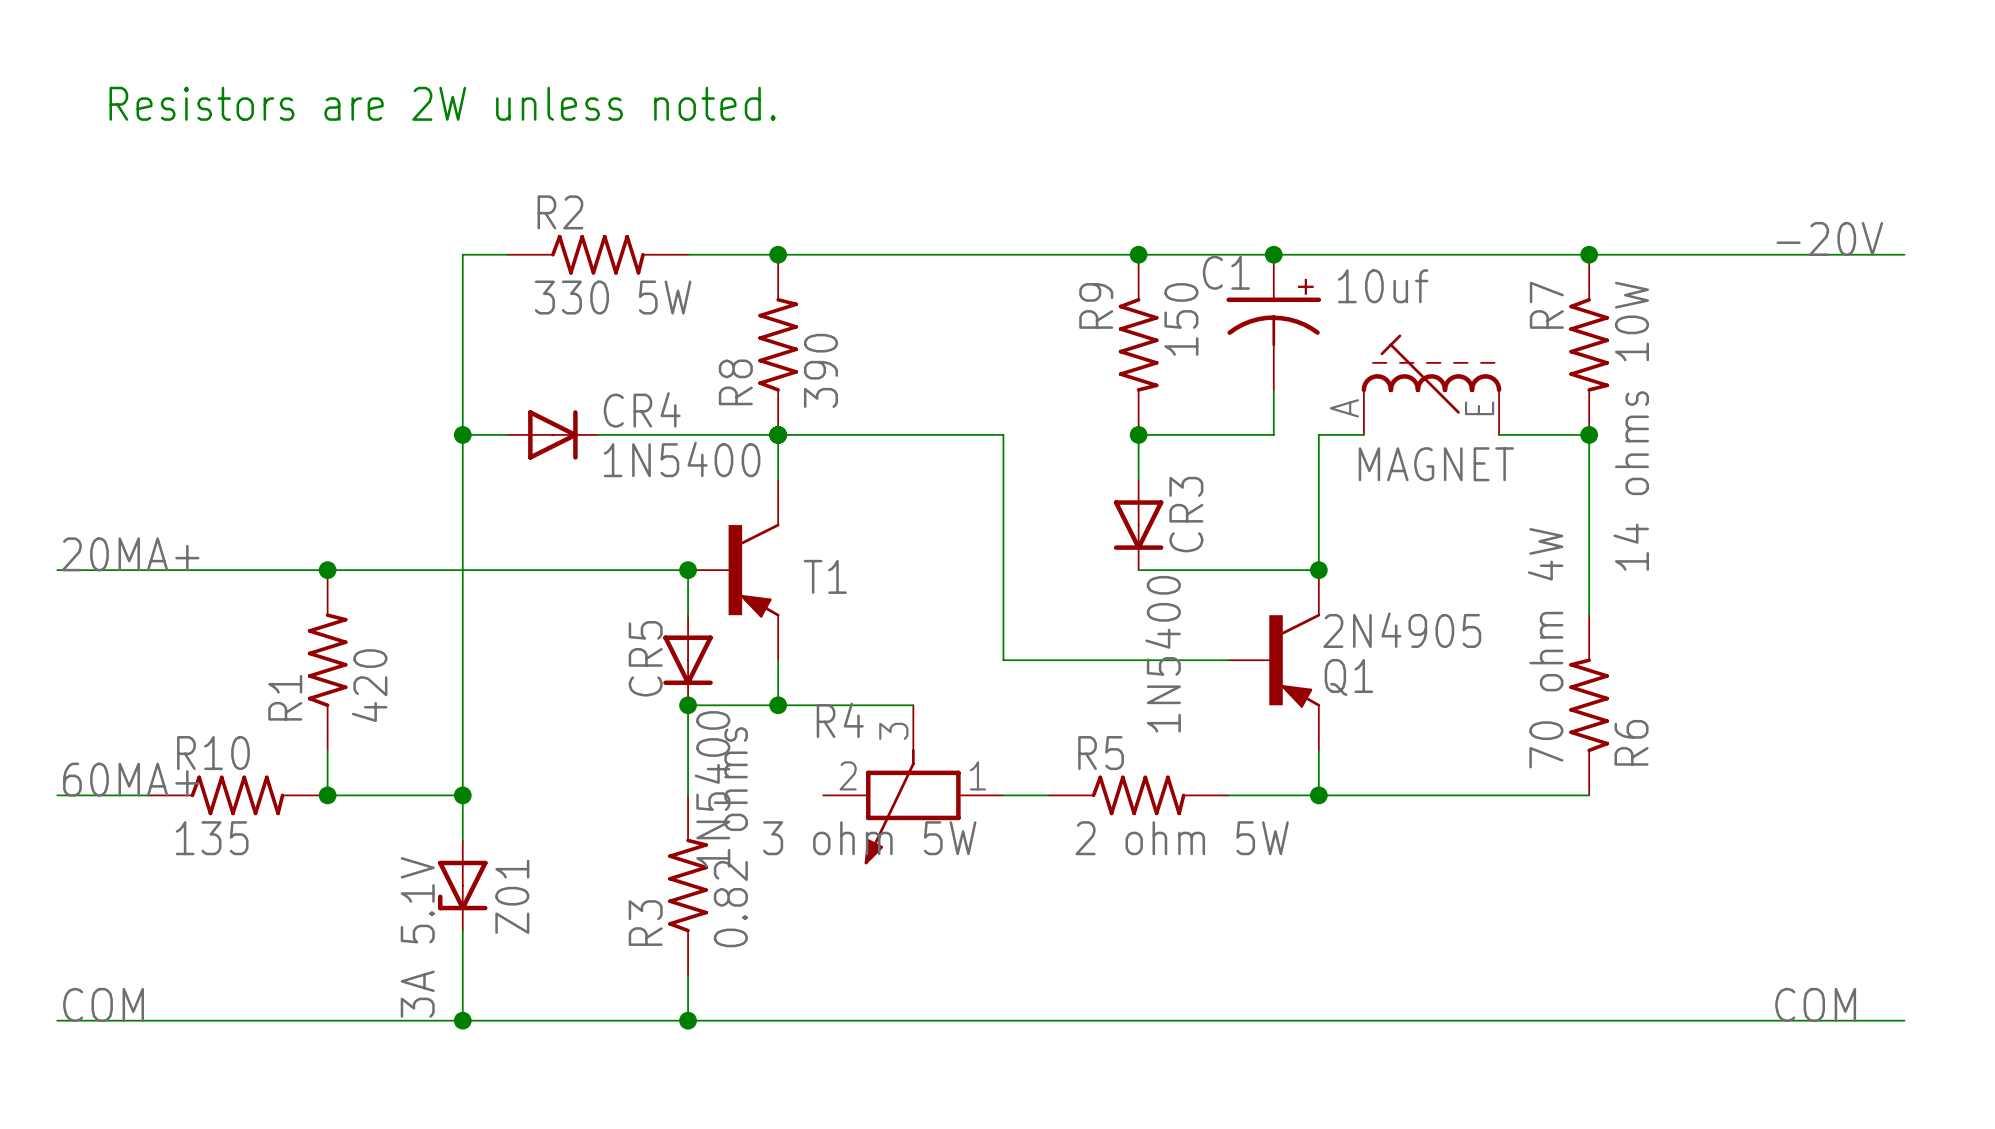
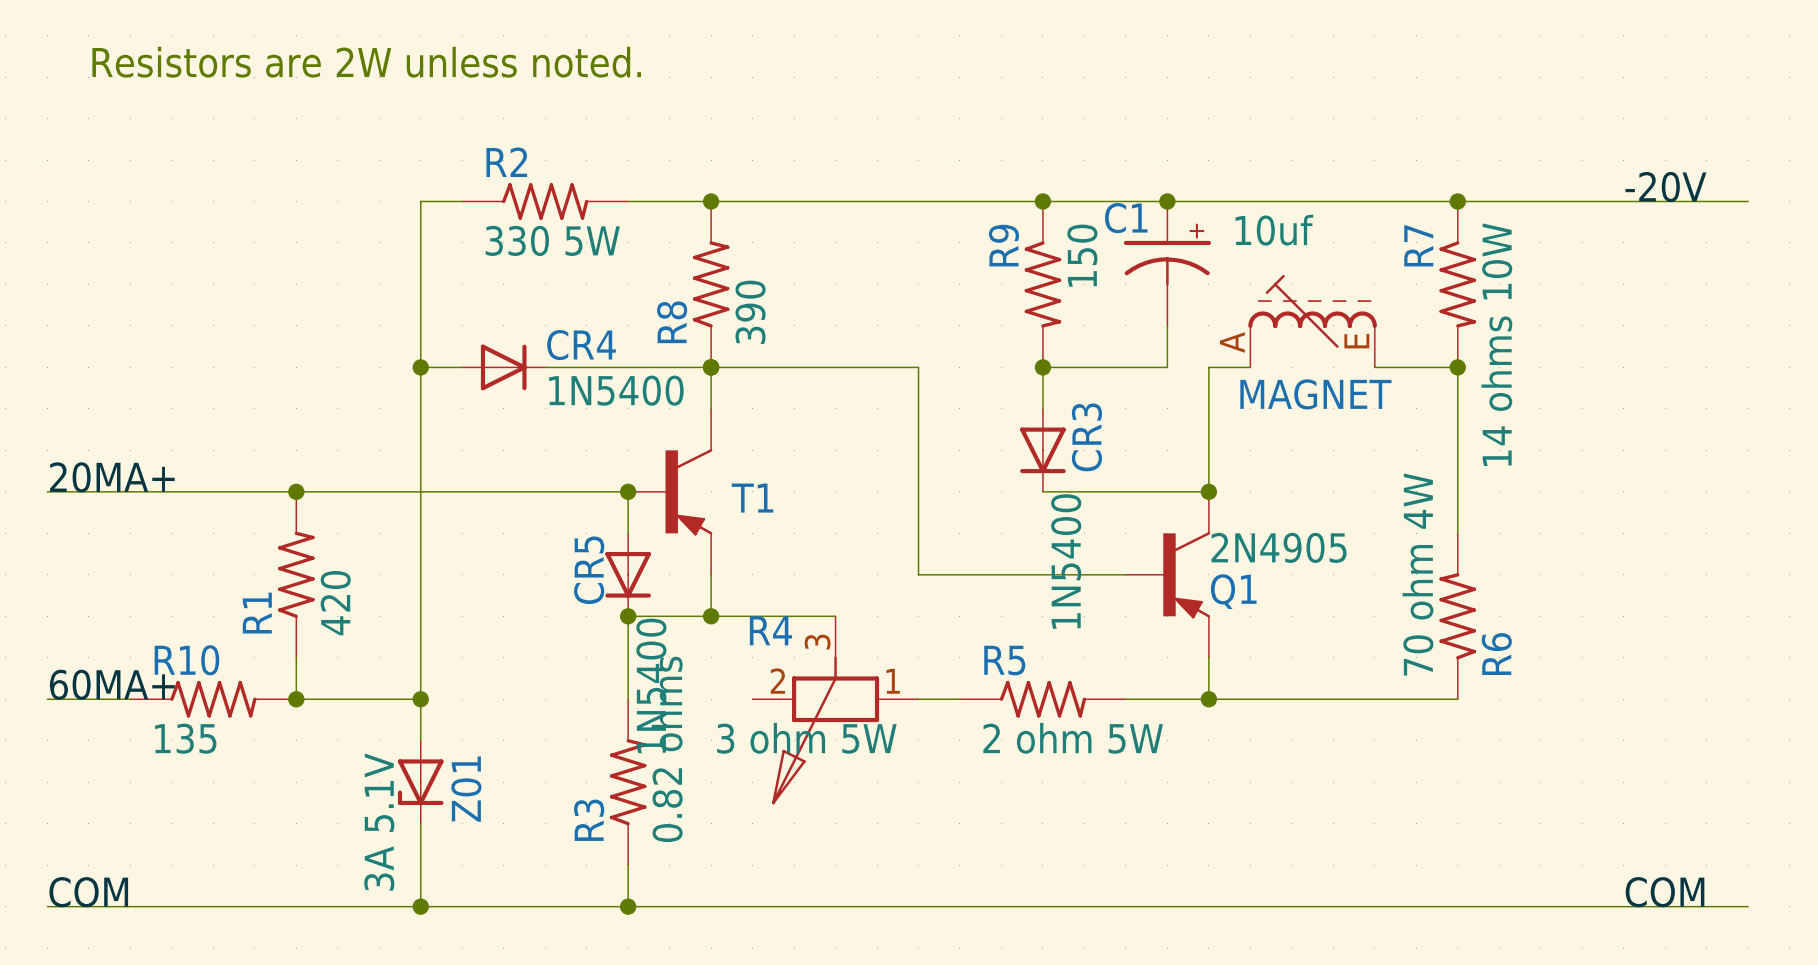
R4 symbol: [823, 705, 1004, 865] -> [752, 616, 919, 805]

